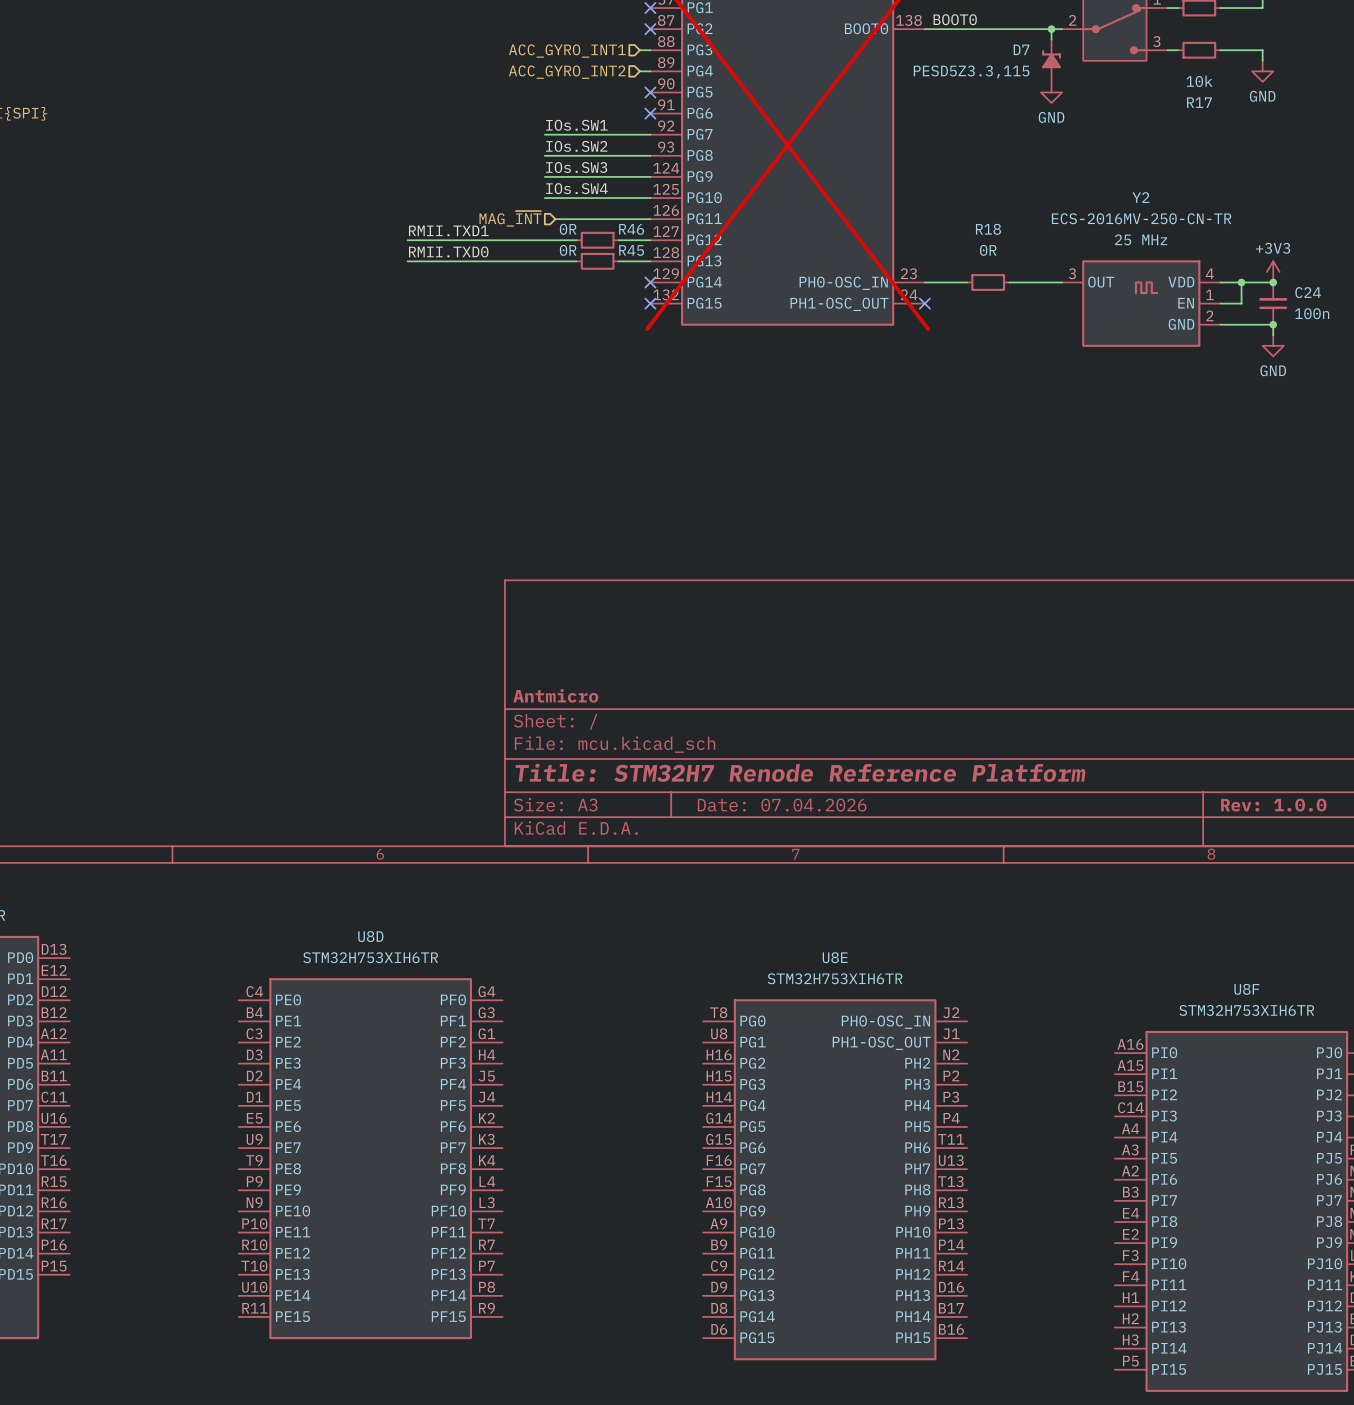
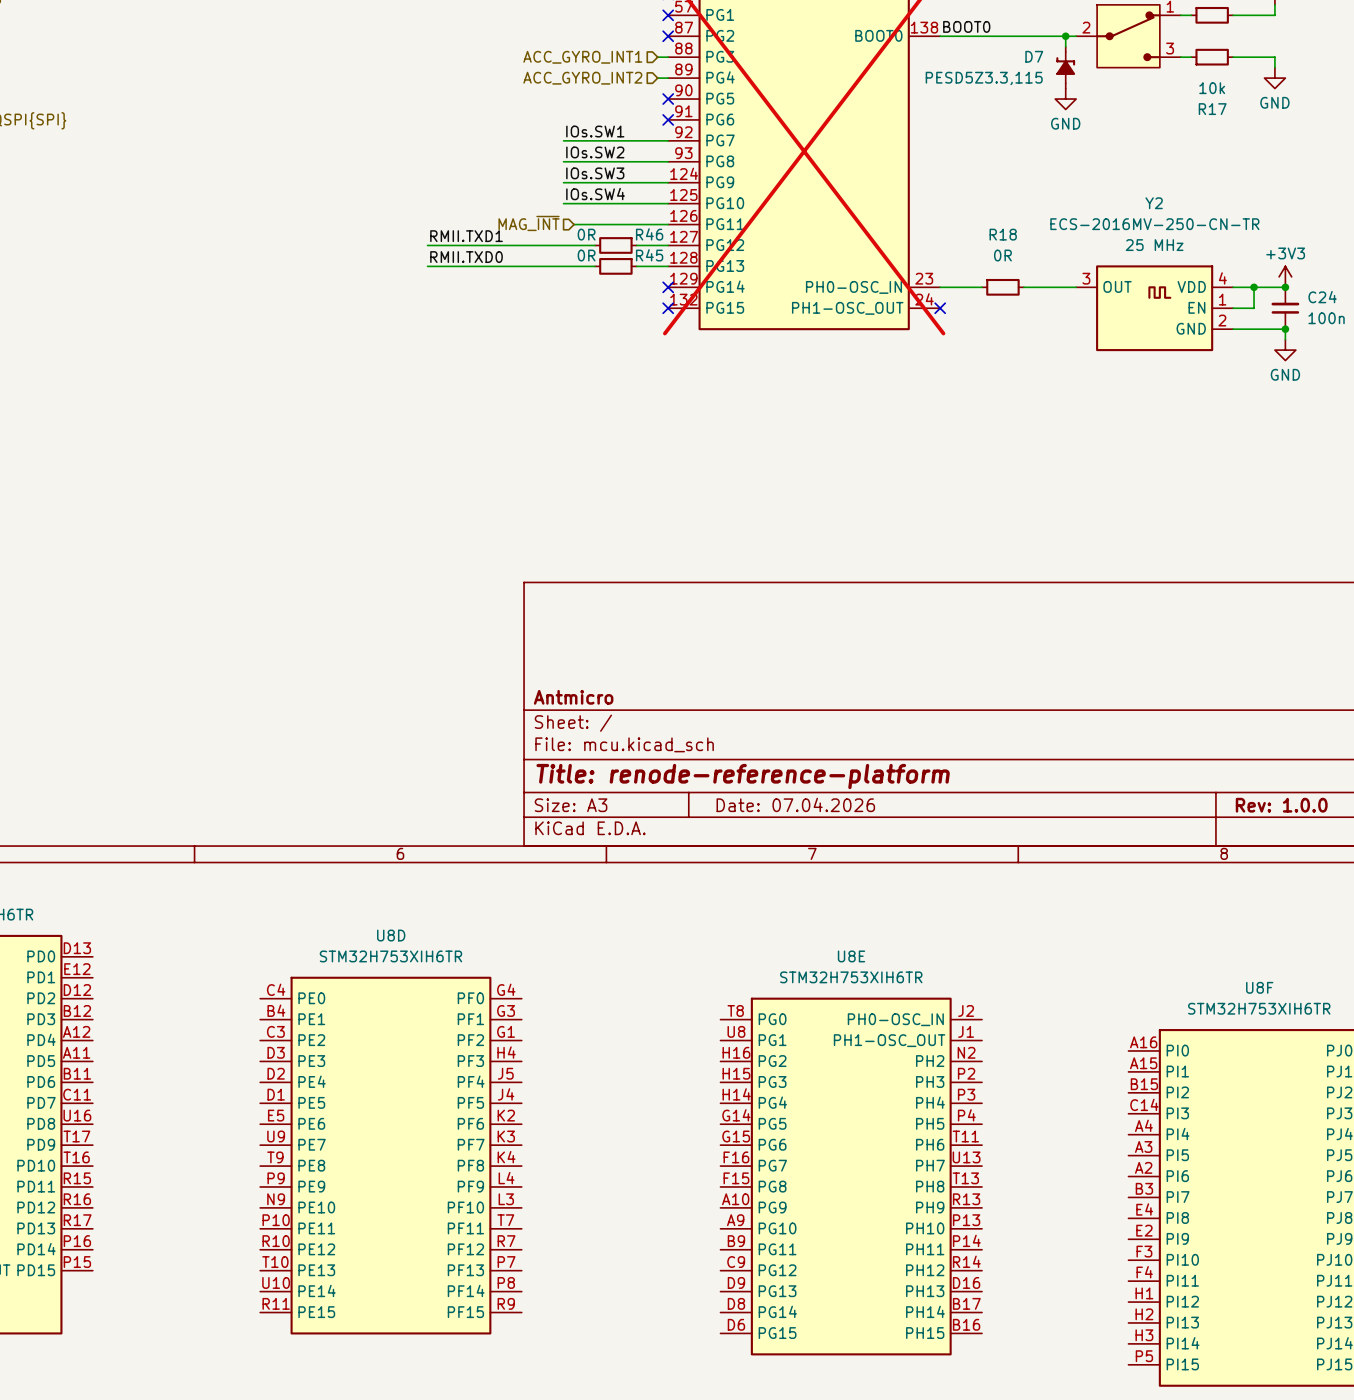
title block: Title: STM32H7 Renode Reference Platform (800, 772) -> Title: renode-reference-platform (743, 776)

